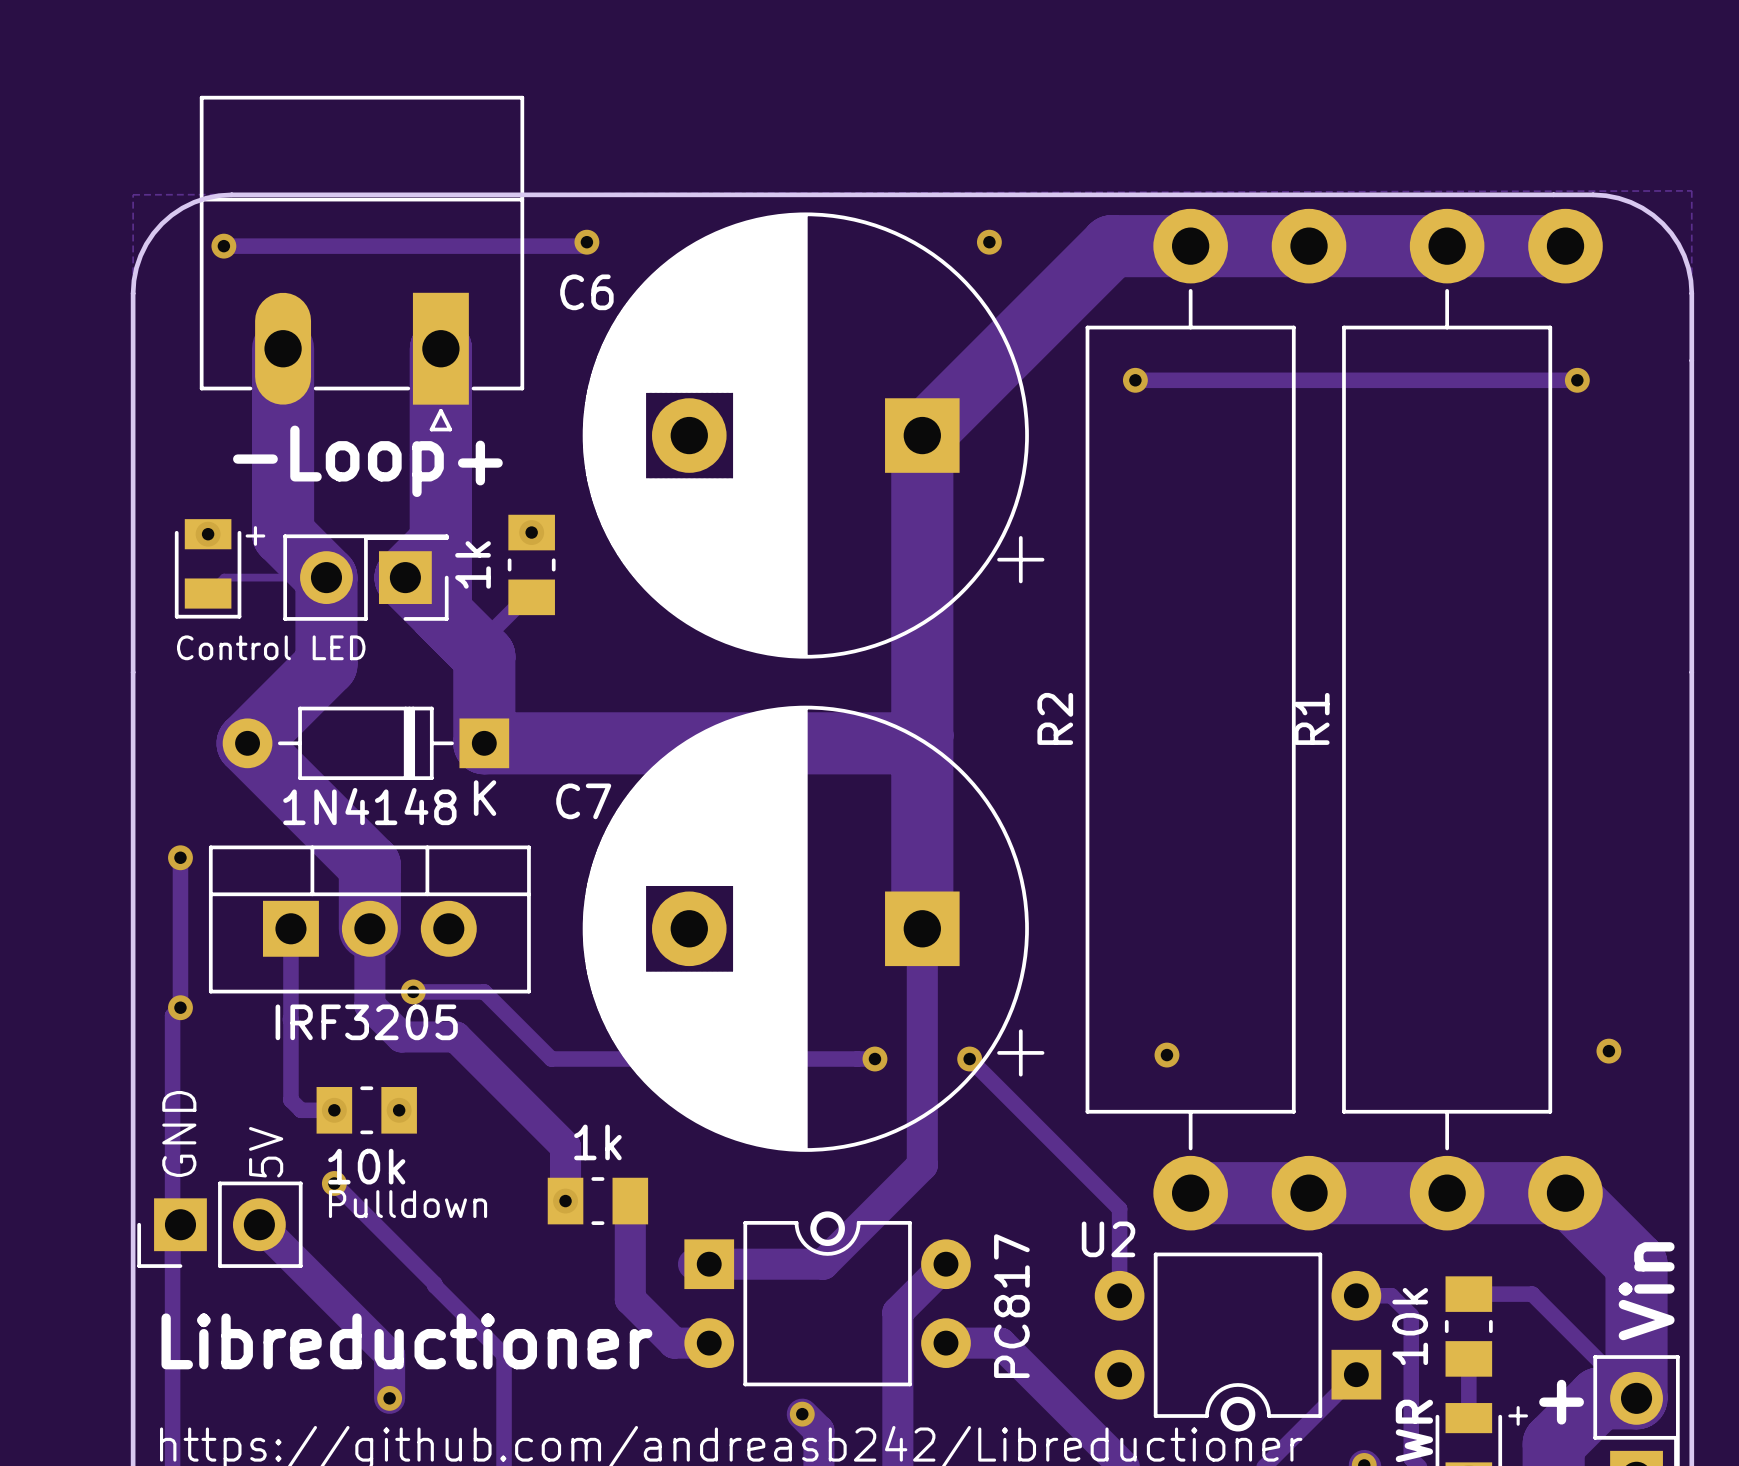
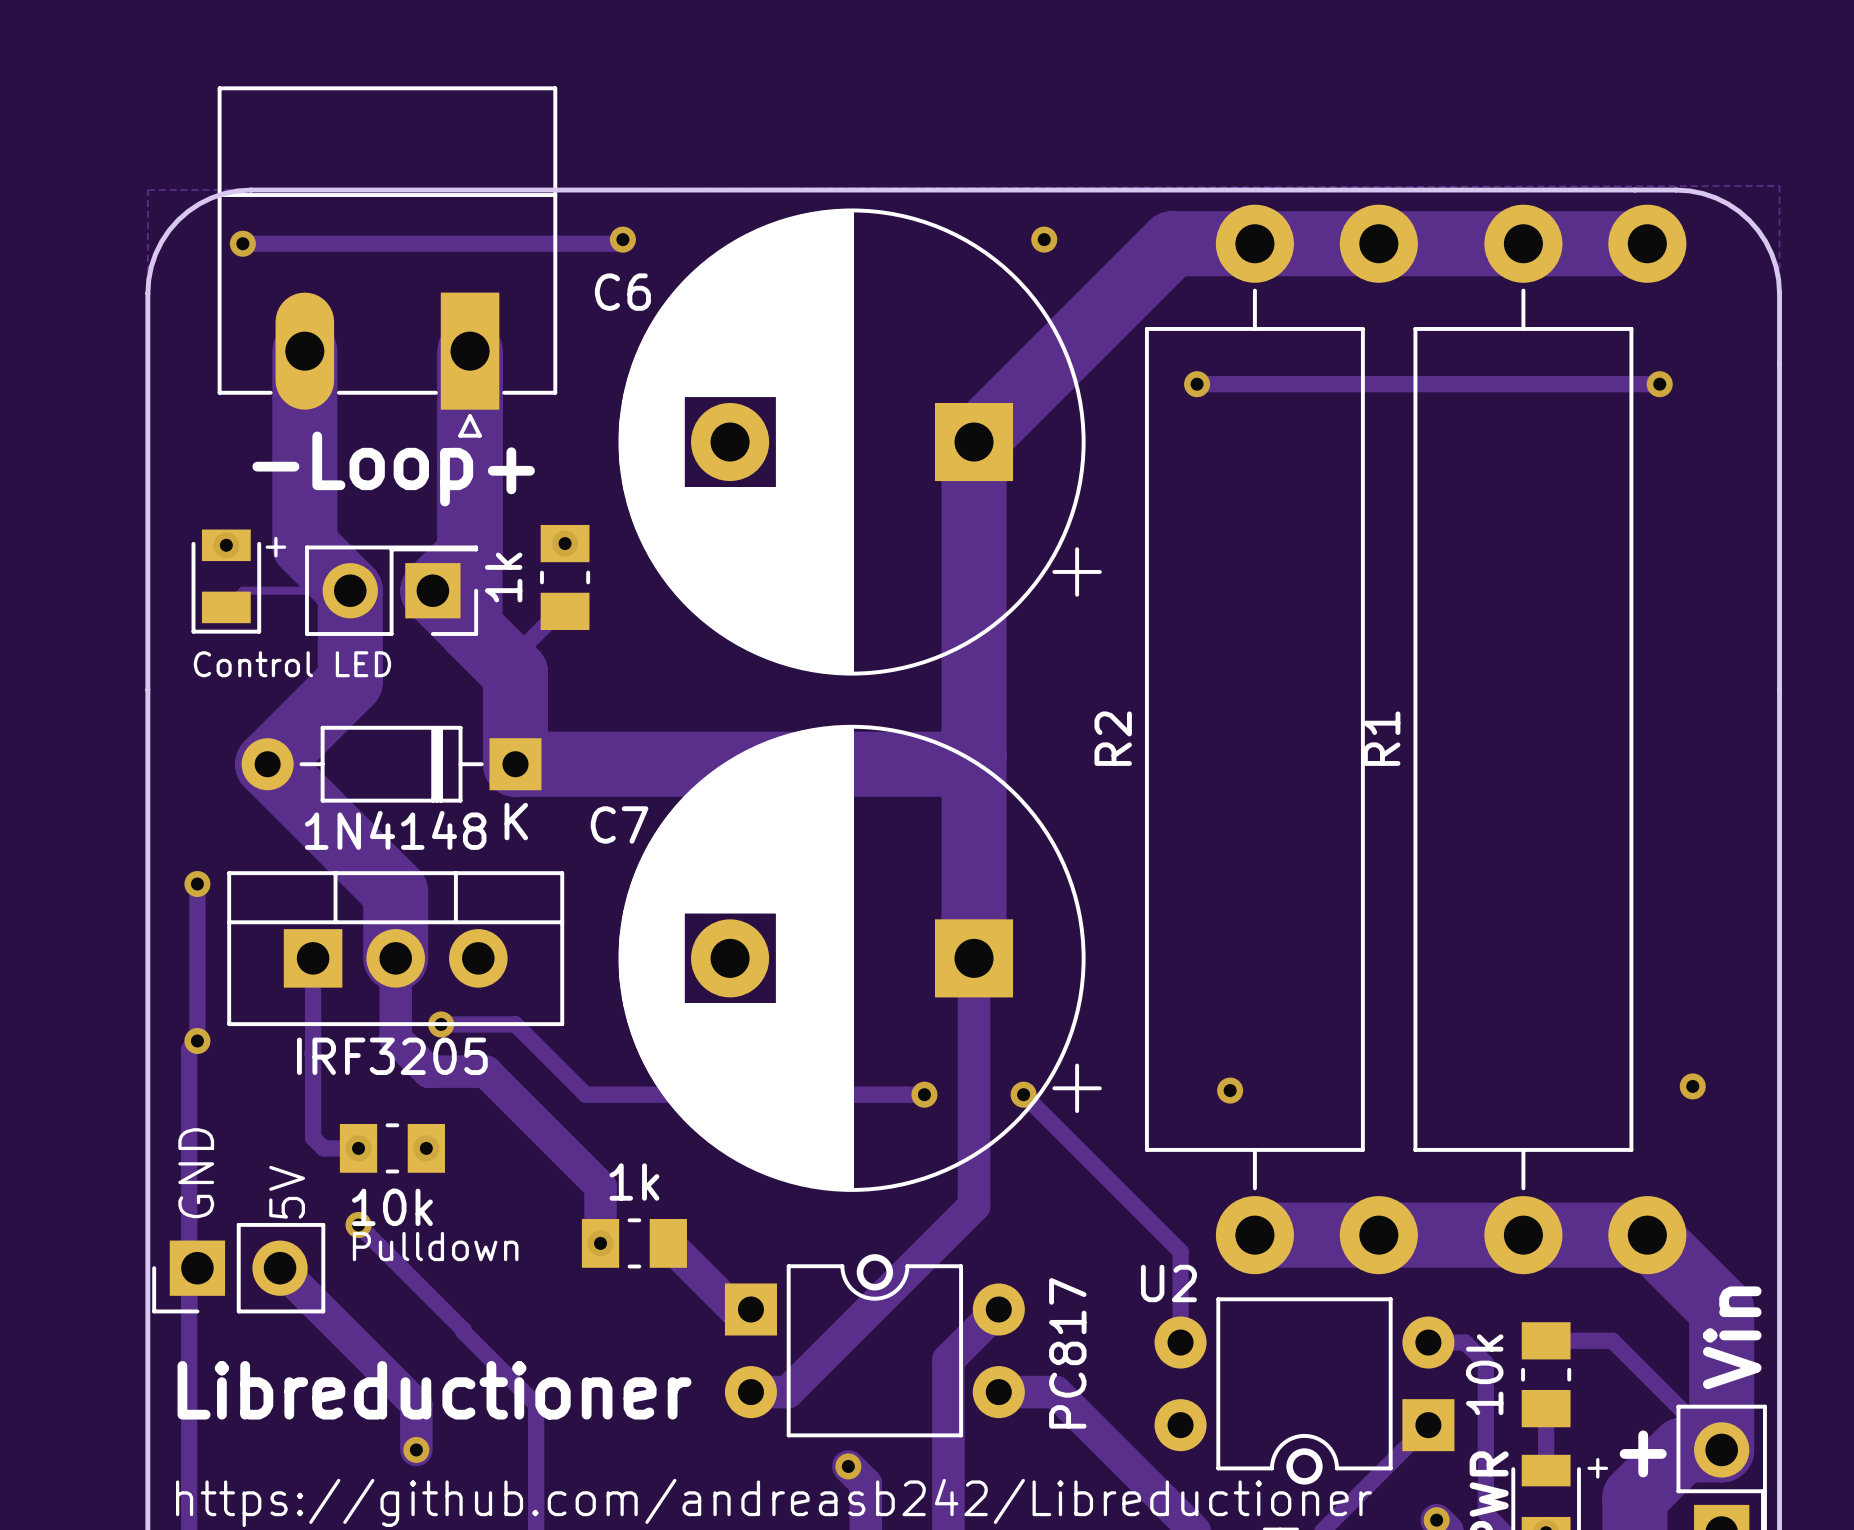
track: (630, 1201) (630, 1299) (674, 1343) (709, 1343) -> (668, 1243) (734, 1309)
track: (709, 1264) (823, 1264) -> (750, 1392) (787, 1392) (870, 1309)

